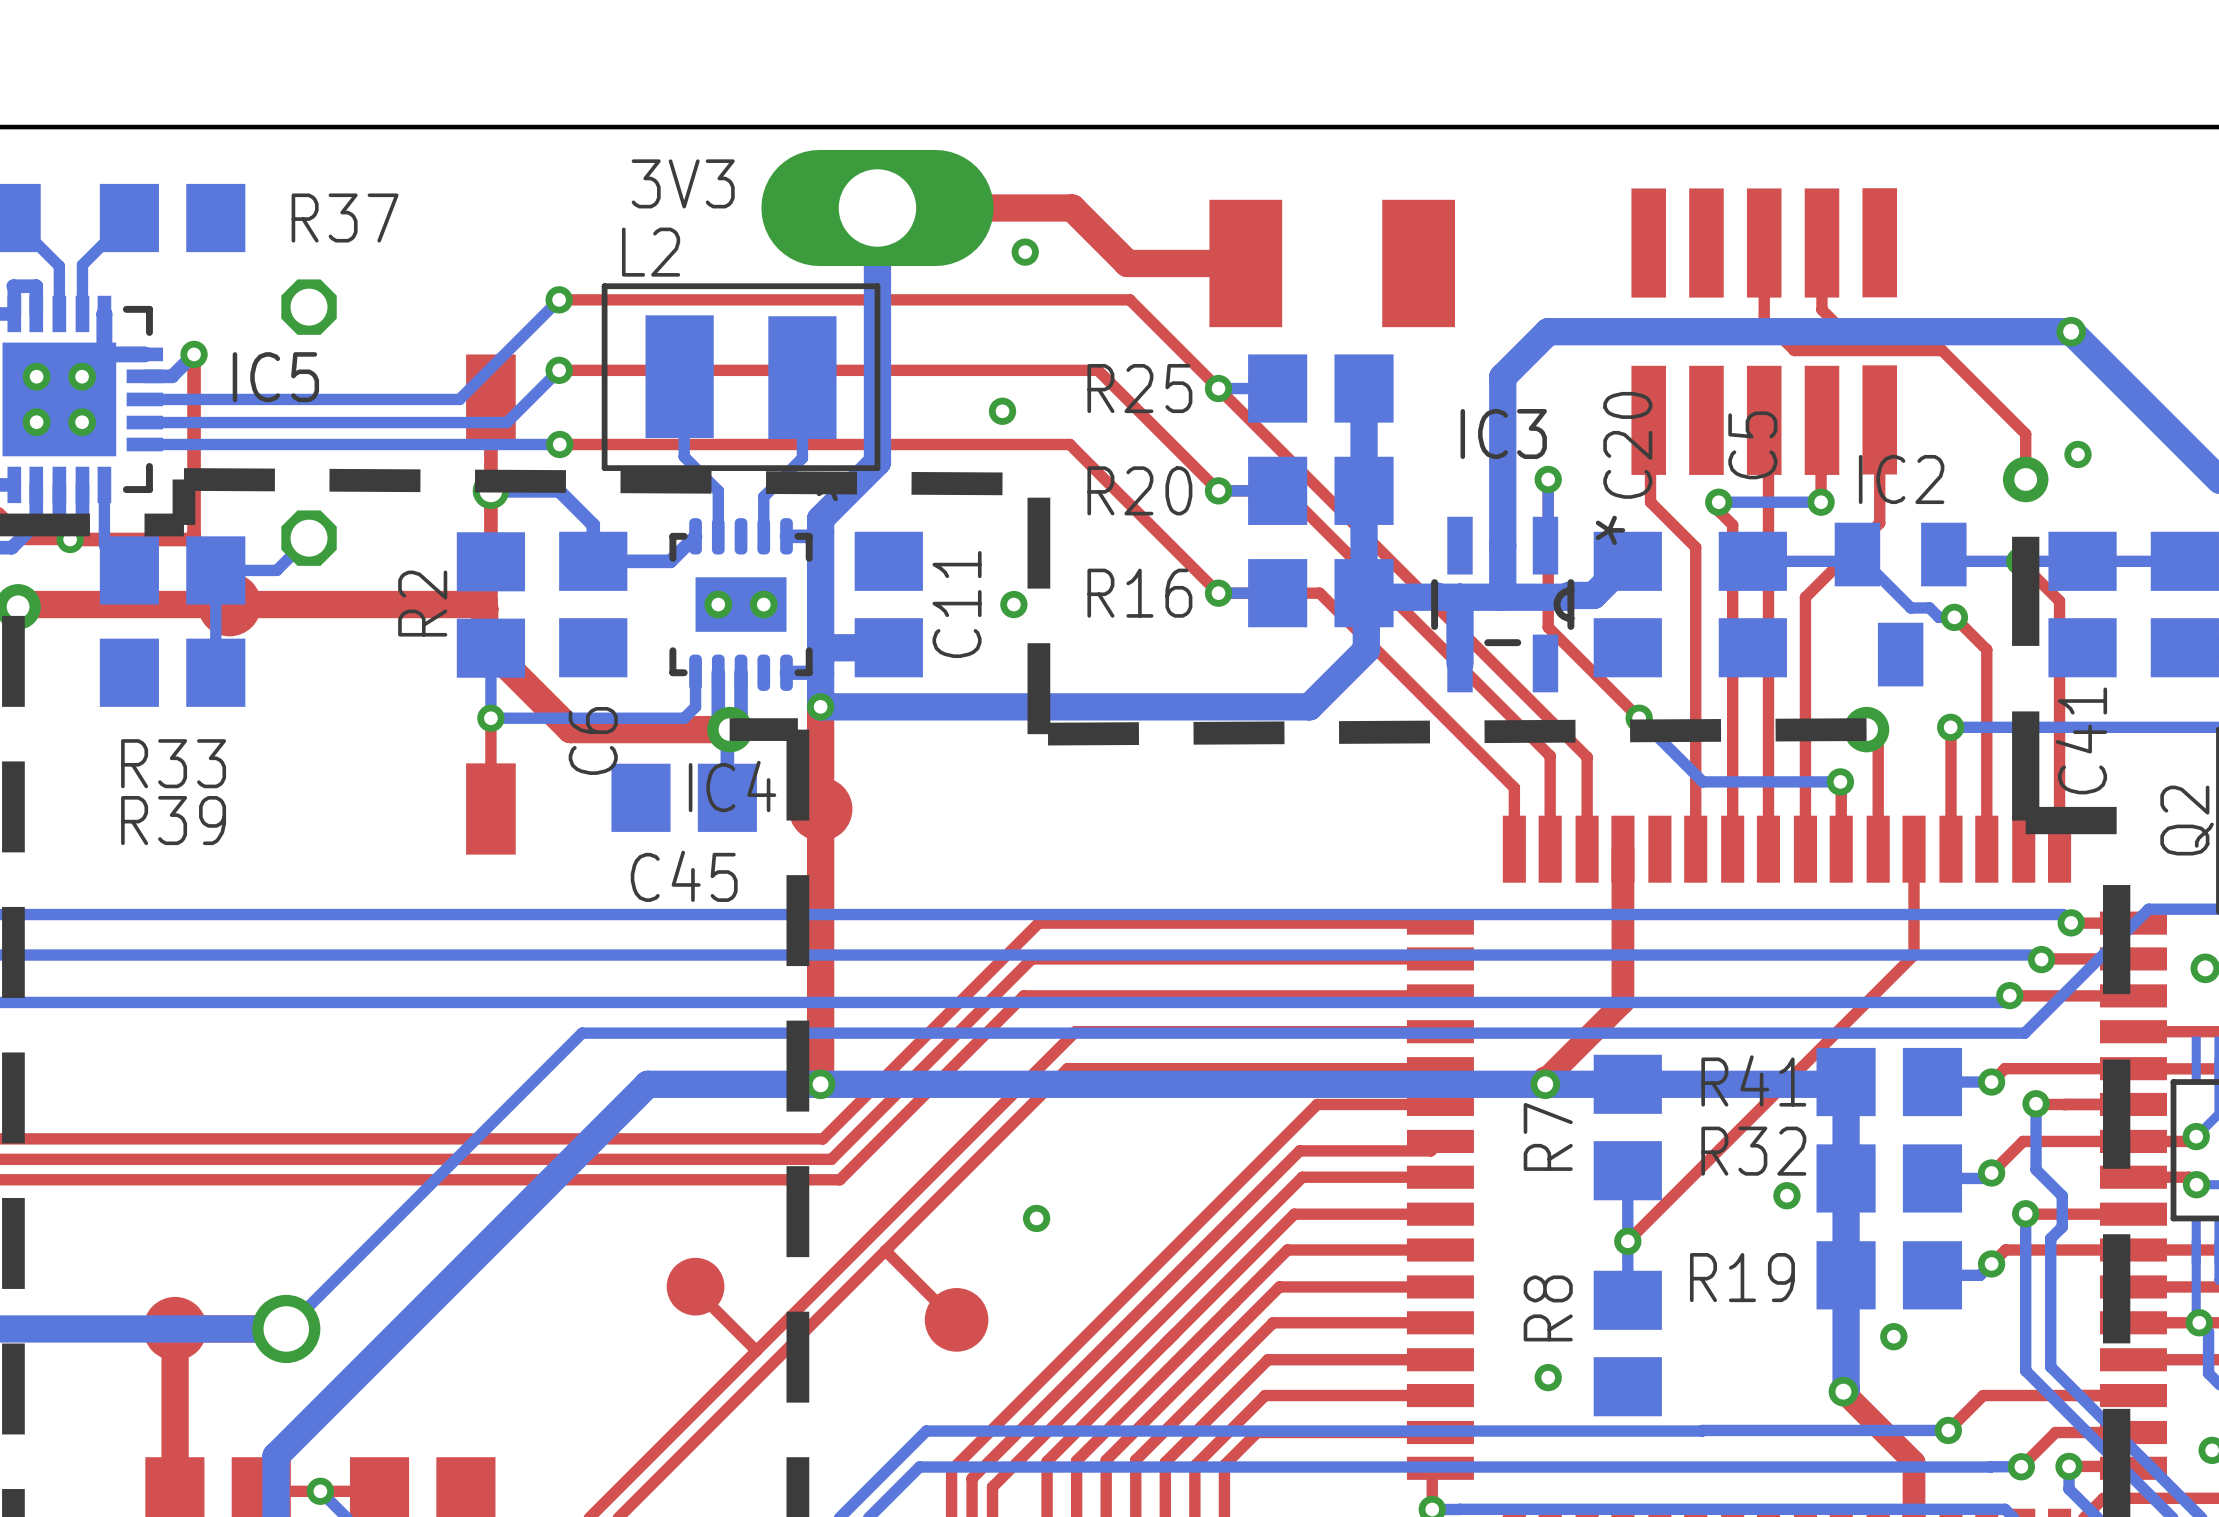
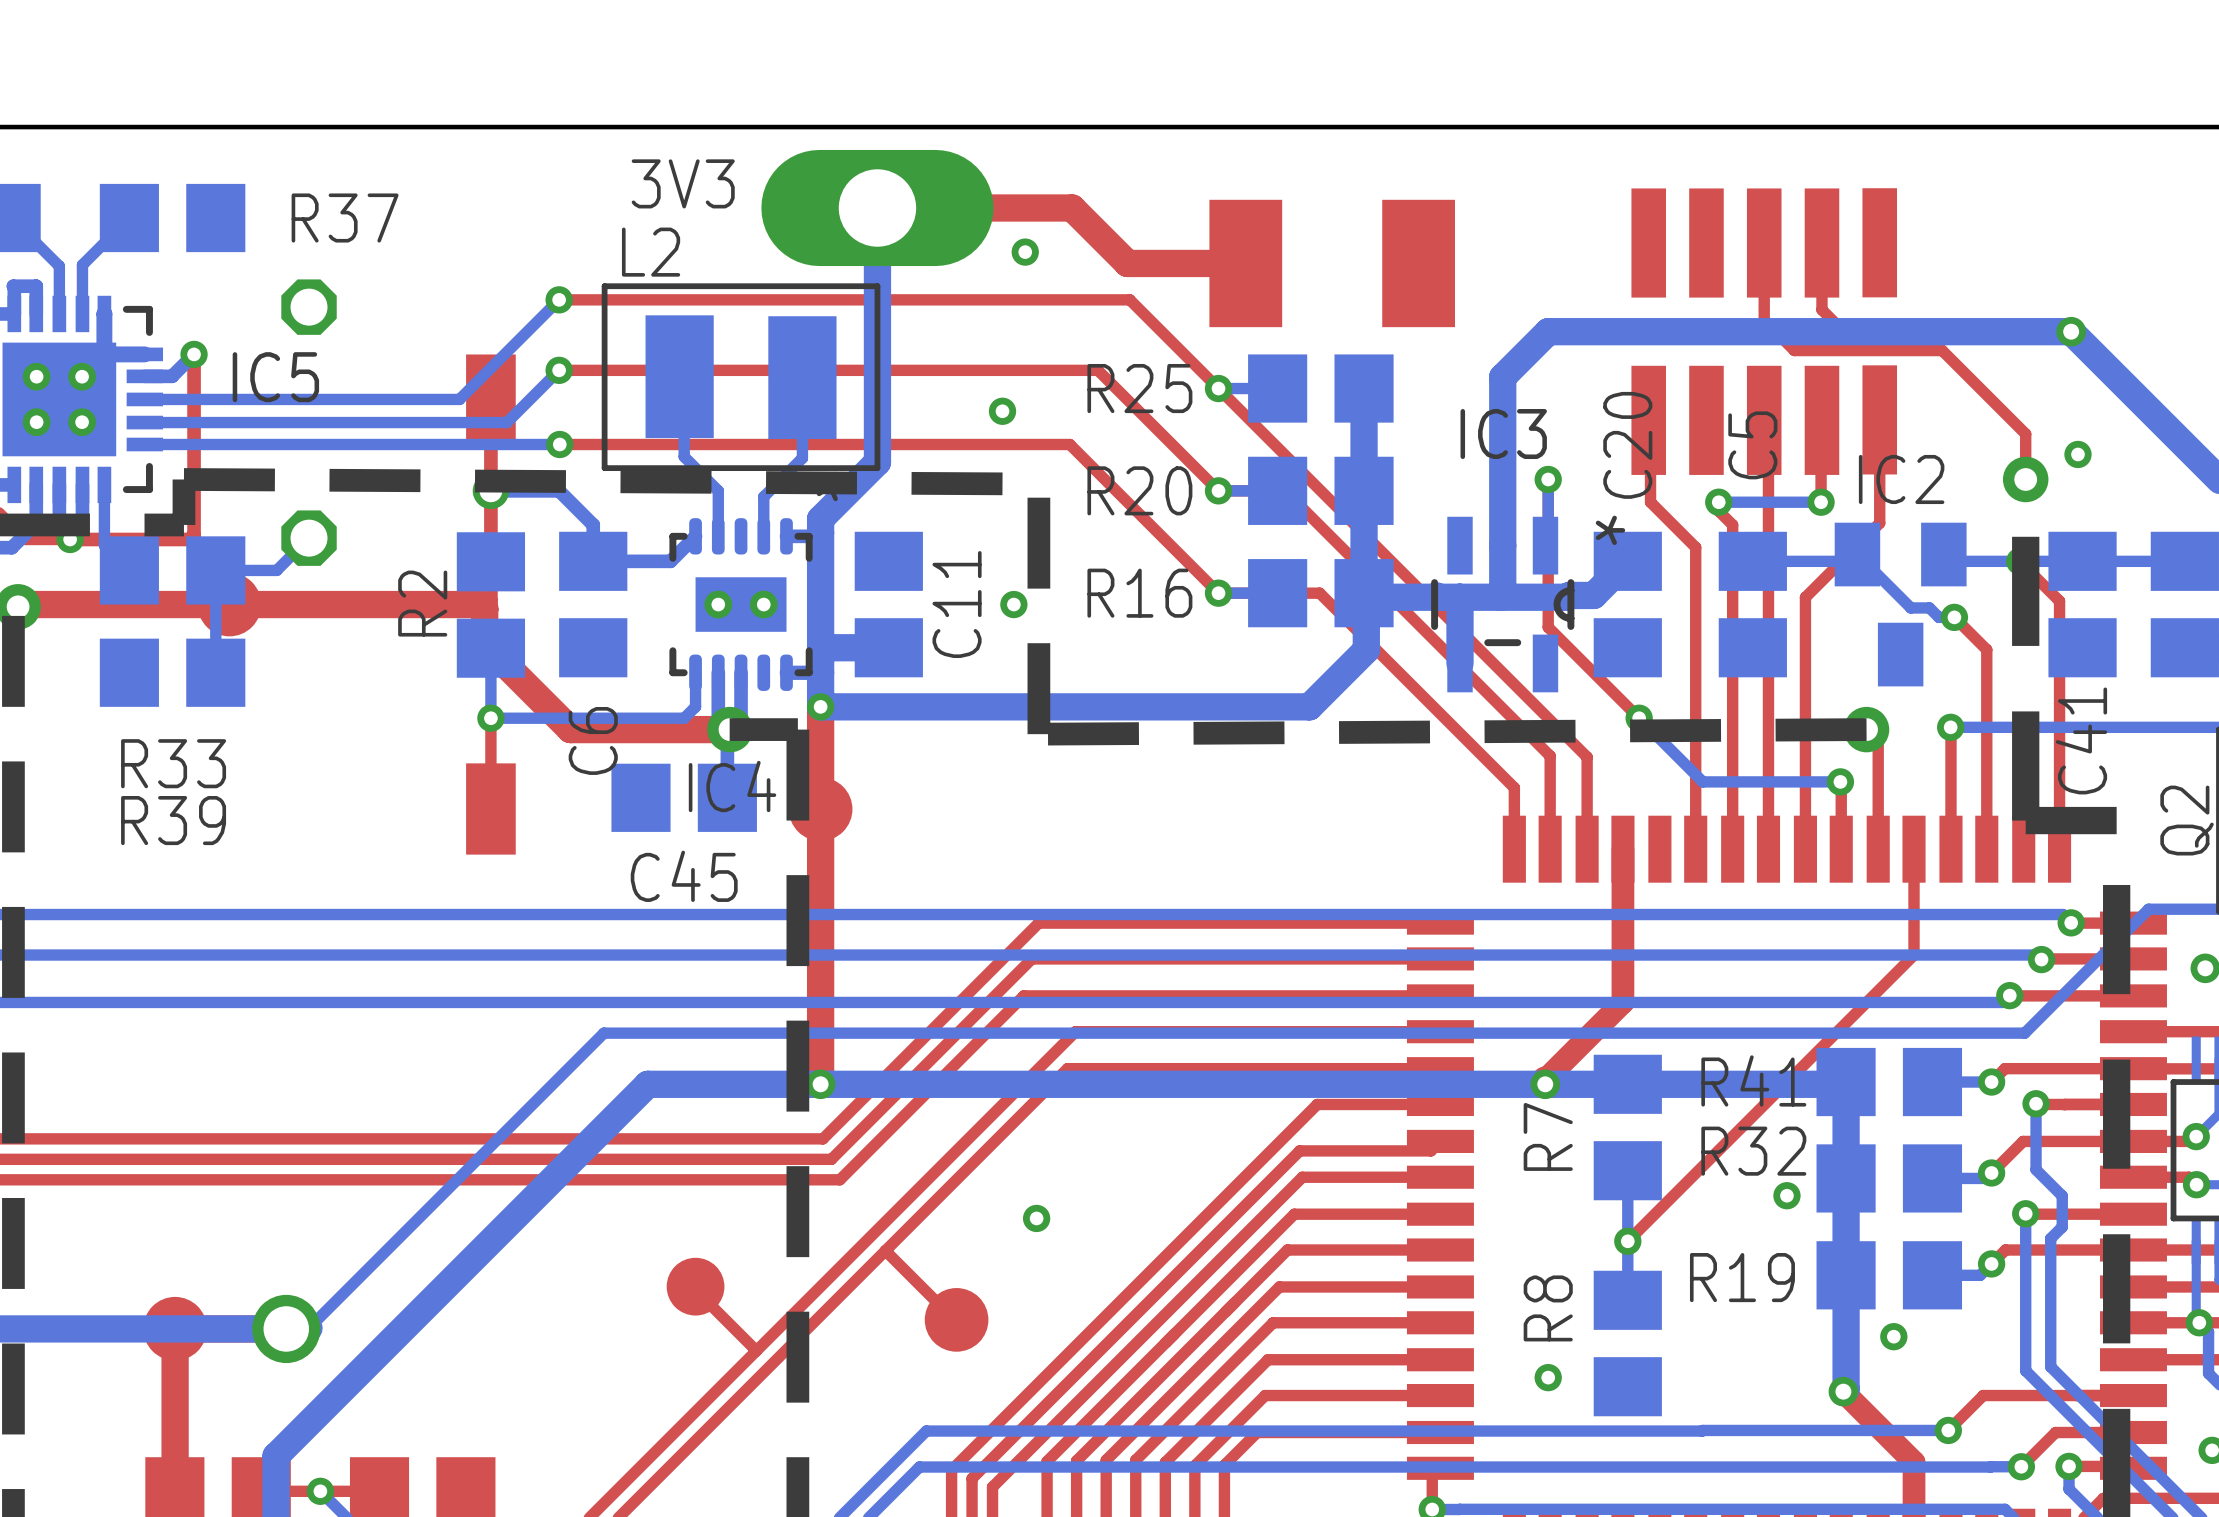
bottom track: (603, 1033) (582, 1033) (286, 1328) -> (603, 1033) (308, 1328) (286, 1328)

